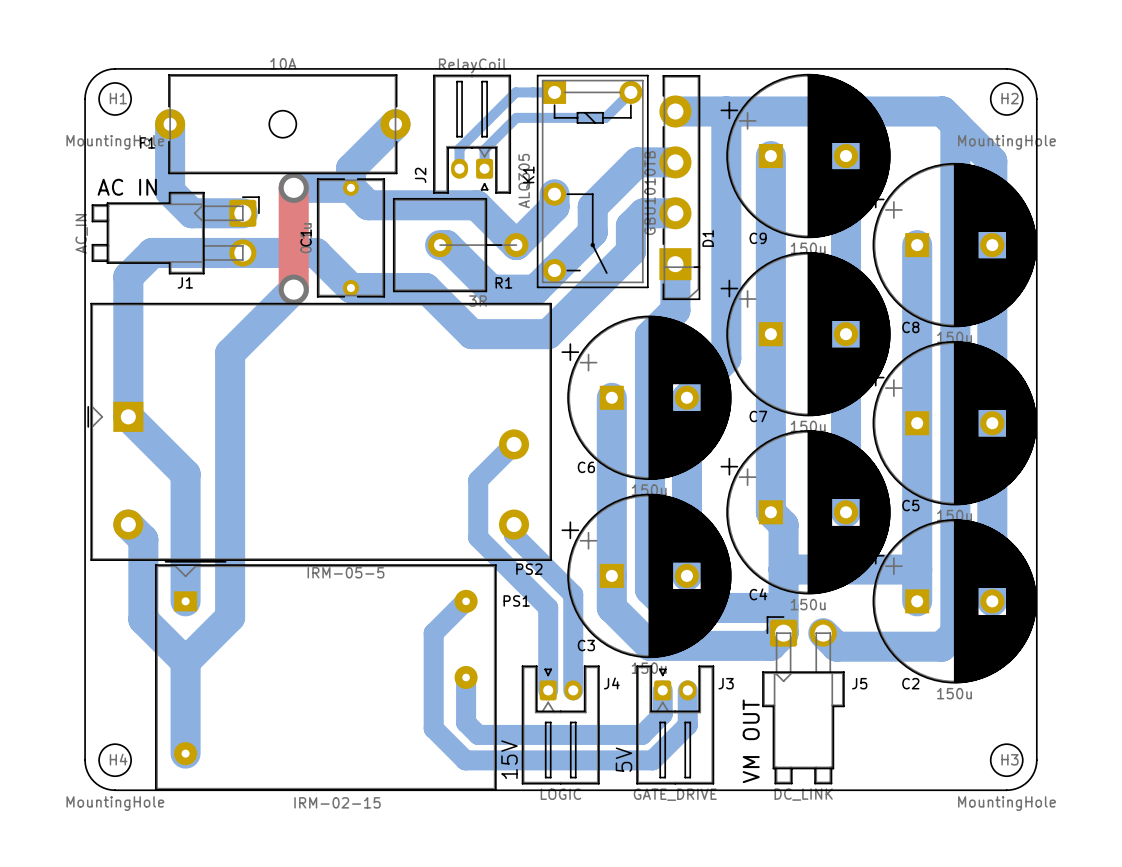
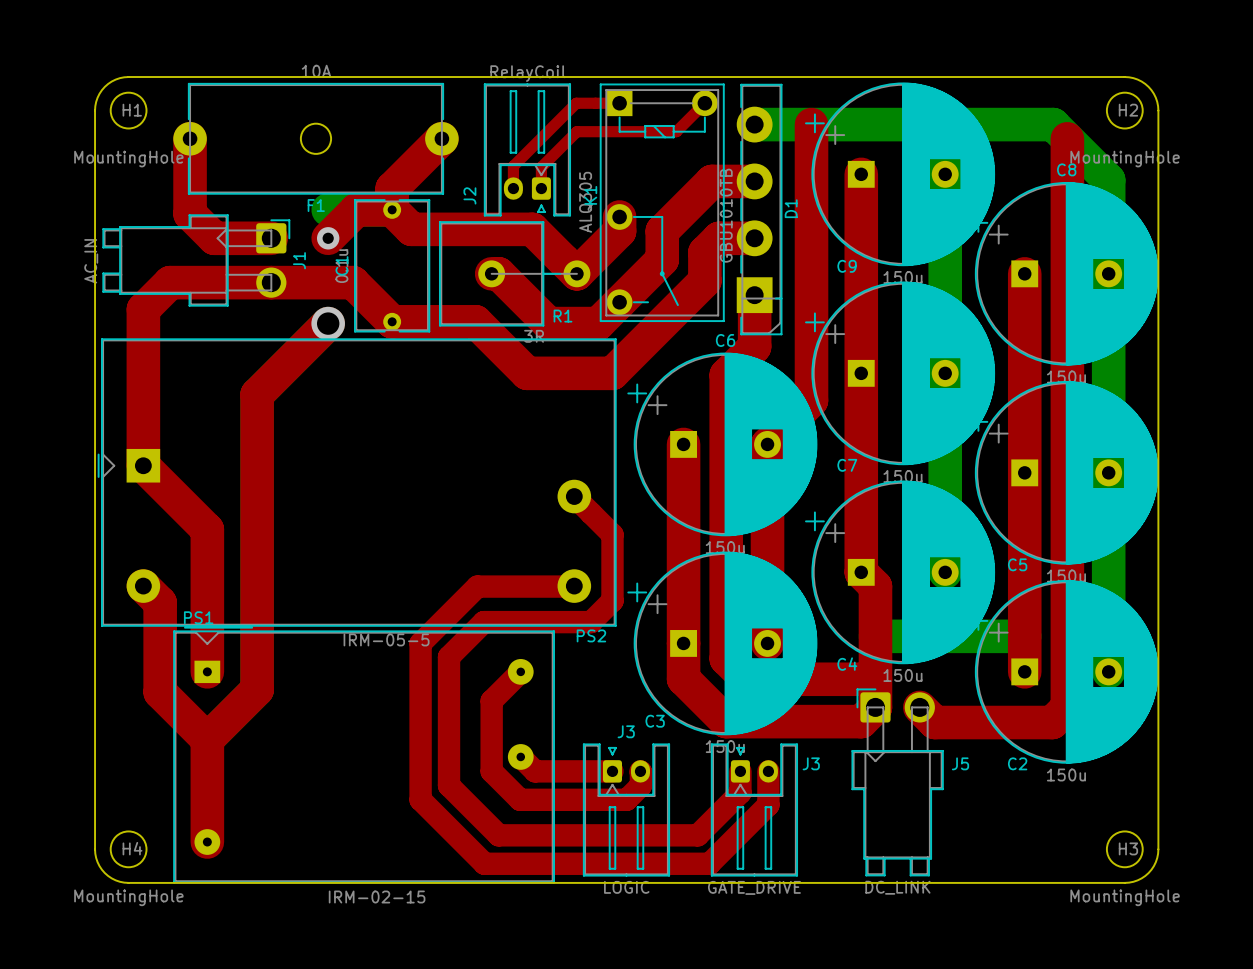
bottom track: (554, 92) (515, 92) (459, 148) (459, 168) -> none
top track: none -> (619, 103) (576, 103) (513, 166) (513, 188)
bottom track: (630, 92) (605, 117) (516, 117) (484, 149) (484, 168) -> none
top track: none -> (704, 103) (676, 131) (576, 131) (541, 167) (541, 188)
bottom track: (726, 111) (726, 358) (686, 397) (686, 575) -> none
top track: none -> (811, 124) (811, 400) (767, 444) (767, 643)
bottom track: (170, 124) (170, 191) (191, 213) (242, 213) -> none
top track: none -> (190, 138) (190, 213) (214, 238) (271, 238)
bottom track: (395, 124) (350, 168) (350, 187) (368, 205) (476, 205) (516, 245) (554, 206) (554, 194) -> none
top track: none -> (441, 138) (392, 188) (392, 209)
bottom track: (955, 124) (955, 633) (941, 646) (836, 646) (823, 633) -> none
top track: none -> (1067, 138) (1067, 707) (1052, 722) (934, 722) (919, 707)
F1 name position: F1 (147, 142) -> F1 (316, 205)
bottom track: (770, 156) (770, 512) (783, 525) (783, 633) (770, 645) (649, 645) (611, 607) (611, 397) -> none
top track: none -> (861, 174) (861, 572) (875, 586) (875, 707) (861, 721) (726, 721) (683, 678) (683, 444)
bottom track: (675, 162) (637, 162) (592, 206) (592, 232) (535, 289) (490, 289) (446, 245) (440, 245) -> none
top track: none -> (754, 181) (712, 181) (662, 231) (662, 259) (598, 323) (548, 323) (498, 273) (491, 273)
text: AC IN (127, 187) -> none
top track: (293, 187) (293, 289) -> (207, 739) (257, 689) (257, 394) (328, 323)
via: (293, 187) -> none
top track: none -> (392, 209) (411, 229) (532, 229) (576, 273) (619, 231) (619, 216)
top track: none -> (392, 209) (356, 209) (328, 238)
via: none -> (328, 238)
bottom track: (675, 213) (643, 213) (630, 226) (630, 251) (548, 334) (471, 334) (425, 288) (350, 288) (315, 252) (152, 252) (128, 276) (128, 416) (185, 474) (185, 601) -> none
top track: none -> (754, 238) (719, 238) (704, 252) (704, 280) (612, 373) (527, 373) (475, 321) (392, 321) (352, 282) (170, 282) (143, 309) (143, 465) (207, 529) (207, 671)
D1 name position: D1 (708, 238) -> D1 (791, 208)
bottom track: (917, 245) (917, 601) -> none
top track: none -> (1024, 273) (1024, 671)
bottom track: (675, 264) (675, 310) (649, 335) (649, 589) (668, 607) (783, 607) -> none
top track: none -> (754, 295) (754, 346) (726, 375) (726, 658) (746, 679) (875, 678)
J1 name rotation: 0° (185, 282) -> 90° counterclockwise (299, 260)
J1 name position: J1 (185, 282) -> J1 (299, 260)
C8 name position: C8 (910, 327) -> C8 (1066, 169)
bottom track: (514, 444) (478, 480) (478, 537) (548, 607) (548, 690) -> none
top track: none -> (574, 496) (612, 534) (612, 600) (591, 622) (483, 622) (449, 656) (449, 785) (498, 835) (697, 835) (740, 792) (740, 771)
C6 name position: C6 (586, 467) -> C6 (725, 340)
bottom track: (128, 524) (143, 539) (143, 619) (185, 661) (185, 753) -> none
top track: none -> (143, 586) (160, 602) (160, 692) (207, 739)
bottom track: (514, 524) (514, 535) (573, 594) (573, 690) -> none
top track: none -> (574, 586) (477, 586) (420, 643) (420, 799) (484, 863) (709, 863) (768, 804) (768, 771)
PS1 name position: PS1 (516, 600) -> PS1 (198, 617)
bottom track: (466, 601) (433, 633) (433, 728) (465, 760) (652, 760) (687, 725) (687, 690) -> none
top track: none -> (520, 671) (491, 700) (491, 771) (520, 799) (626, 799) (640, 785) (640, 771)
top track: none -> (207, 739) (207, 842)
bottom track: (466, 677) (466, 722) (478, 734) (642, 734) (662, 714) (662, 690) -> none
top track: none -> (520, 756) (535, 771) (612, 771)
J4 name: J4 (611, 683) -> J3 (626, 731)
text: VM OUT (751, 741) -> none
text: 15V (509, 759) -> none
text: 5V (623, 759) -> none

